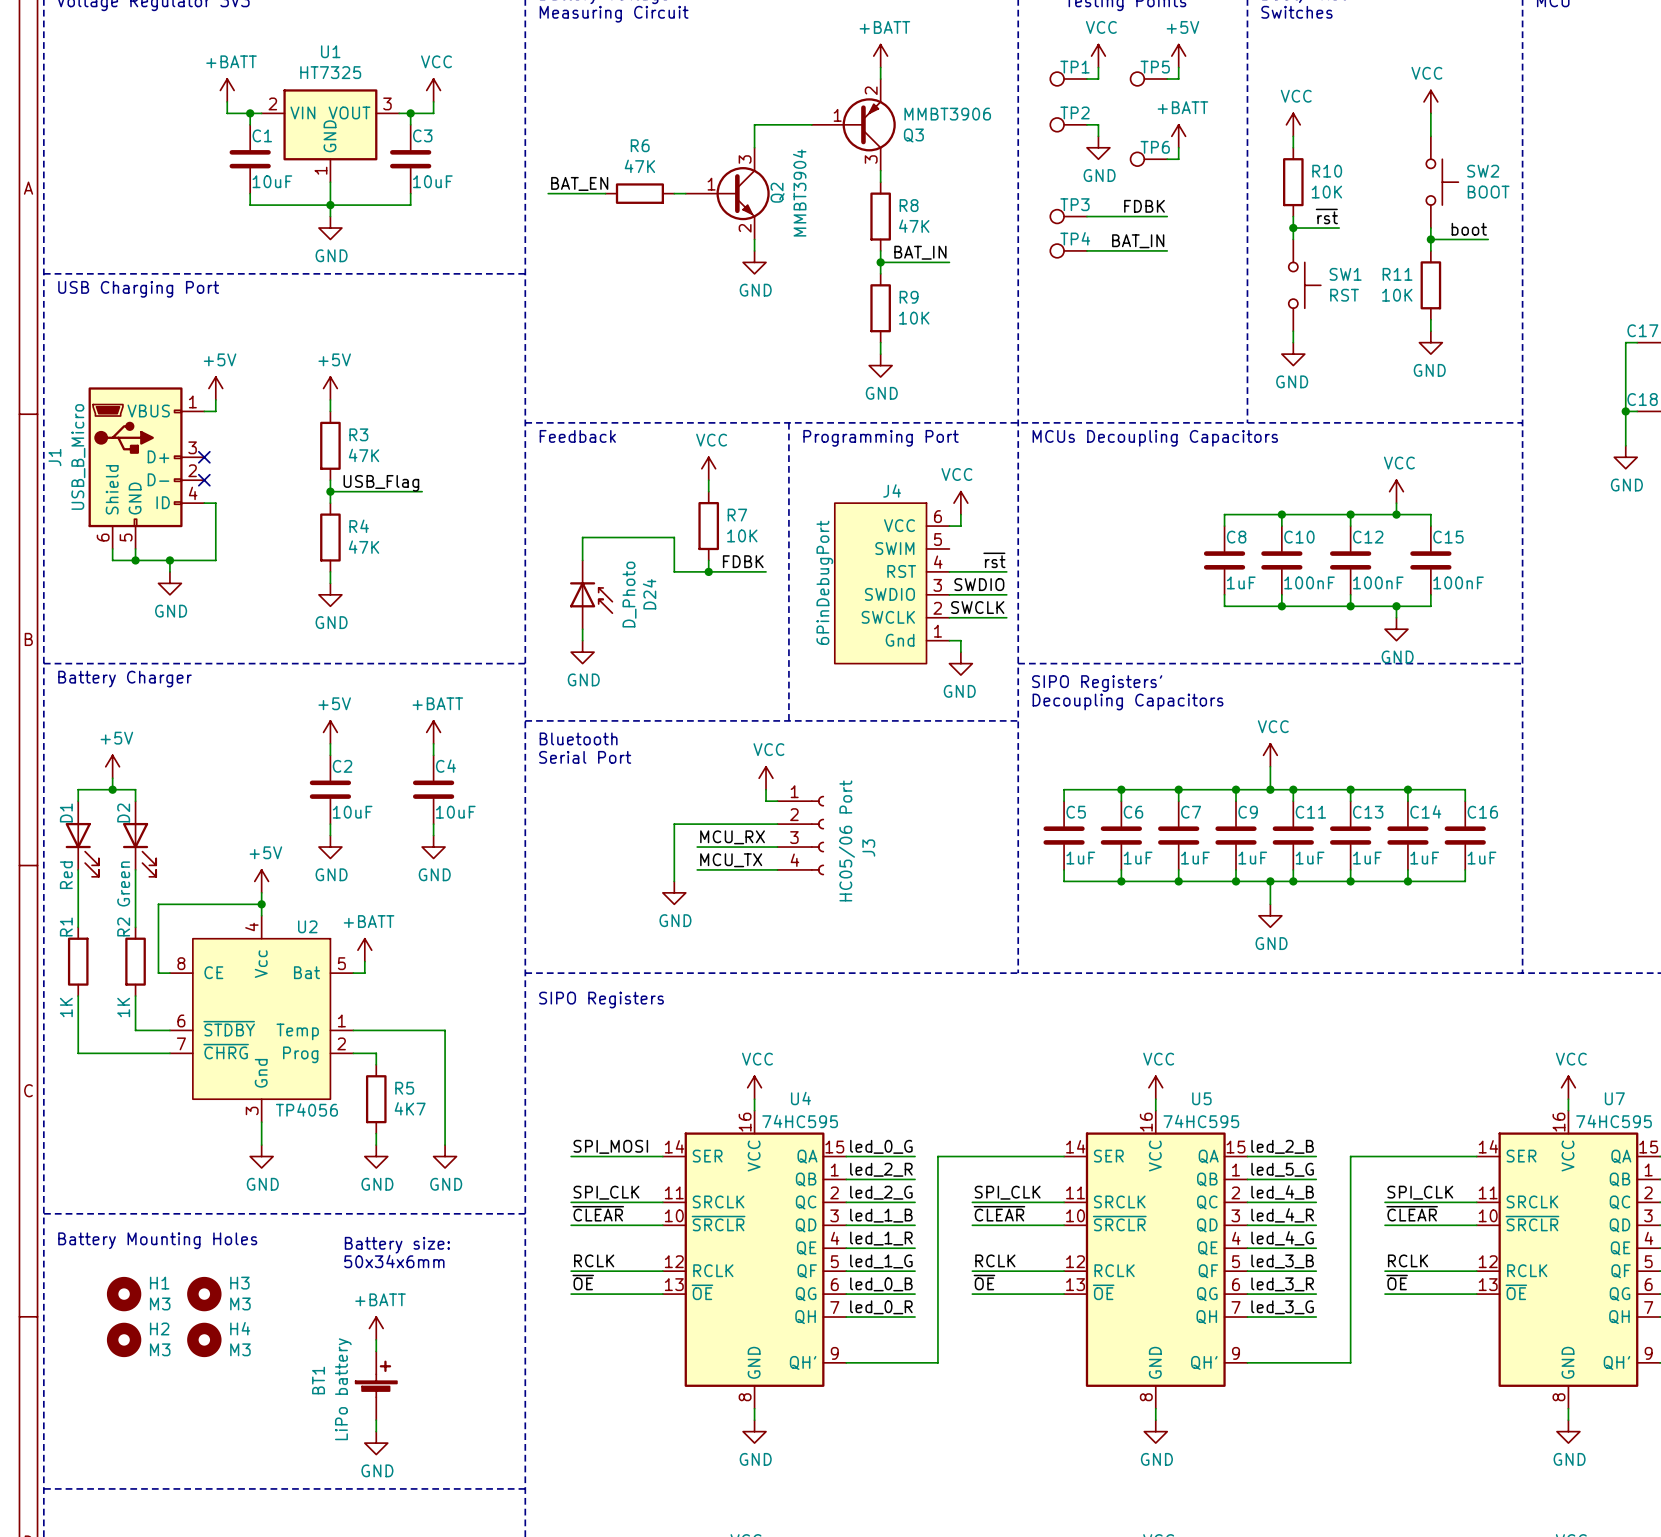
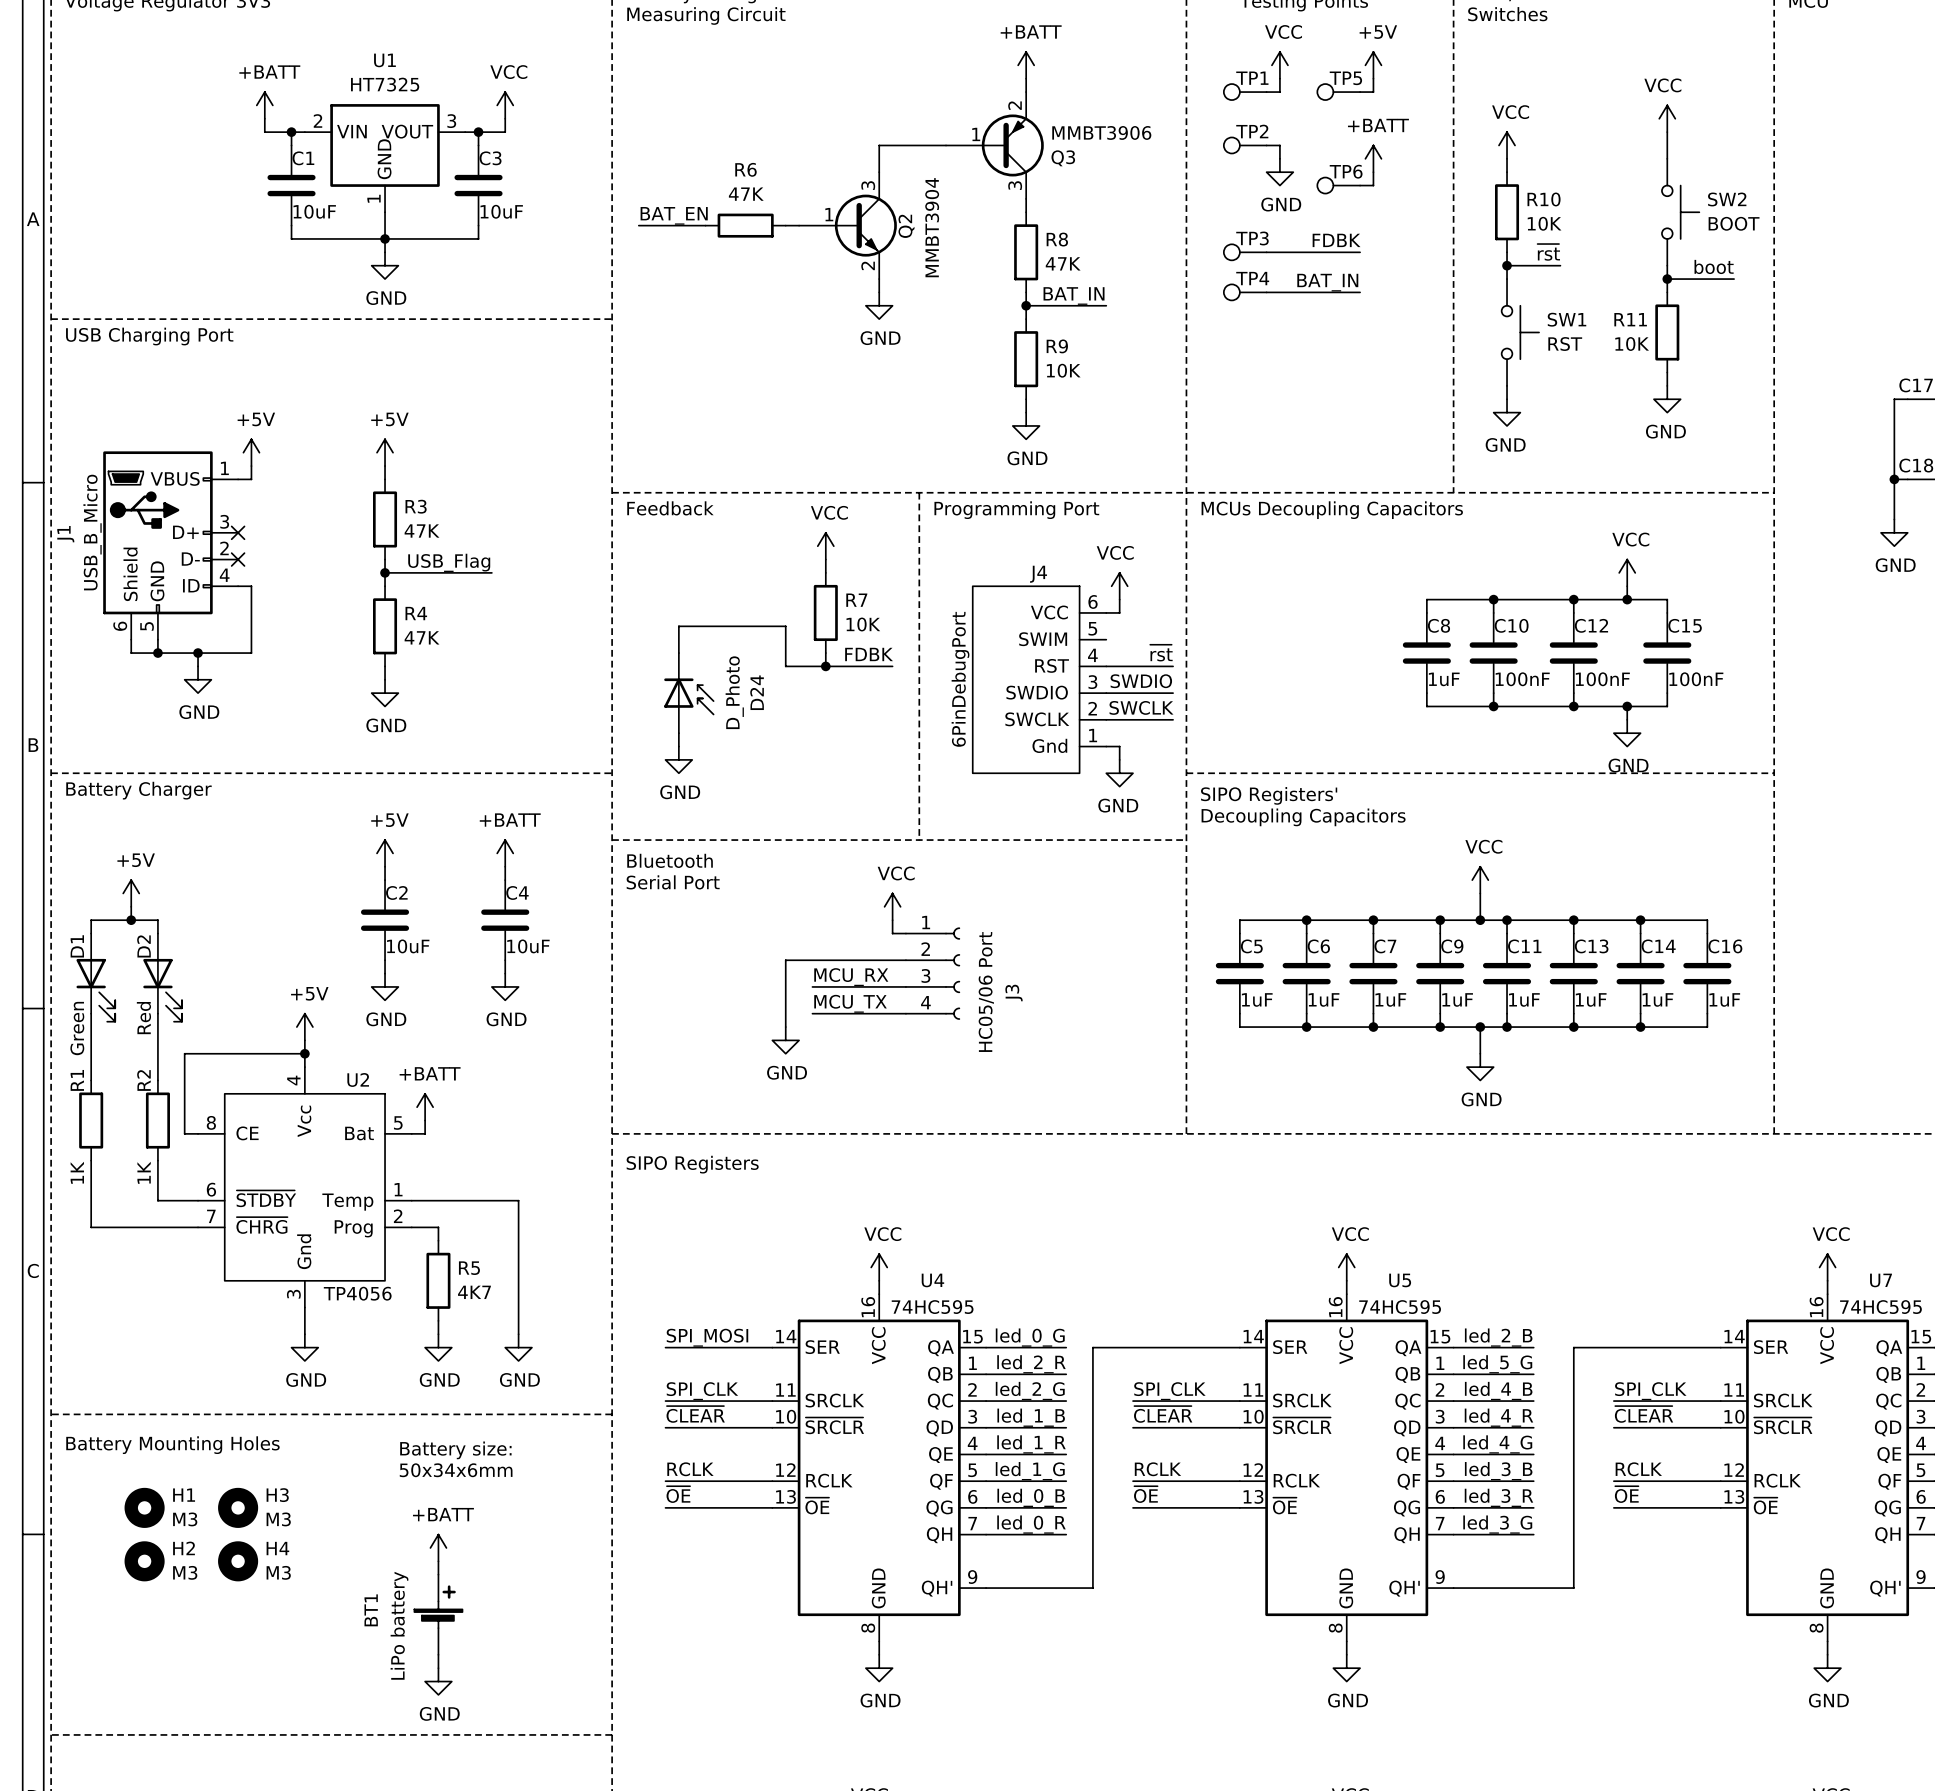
D1 value: Red (66, 875) -> Green (77, 1028)
D2 value: Green (123, 883) -> Red (143, 1018)

